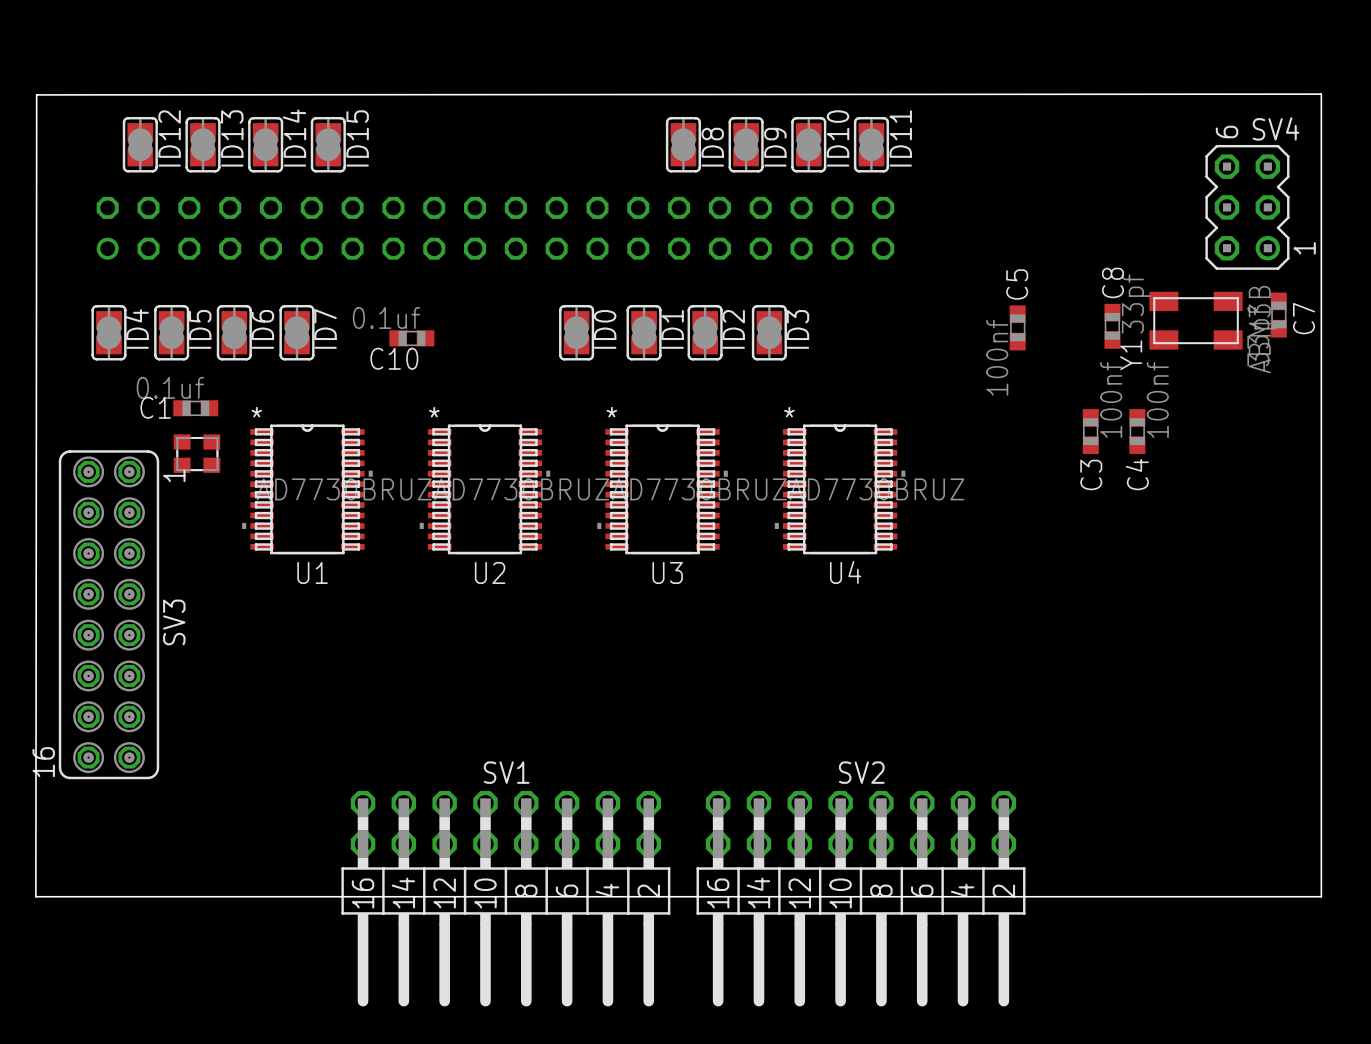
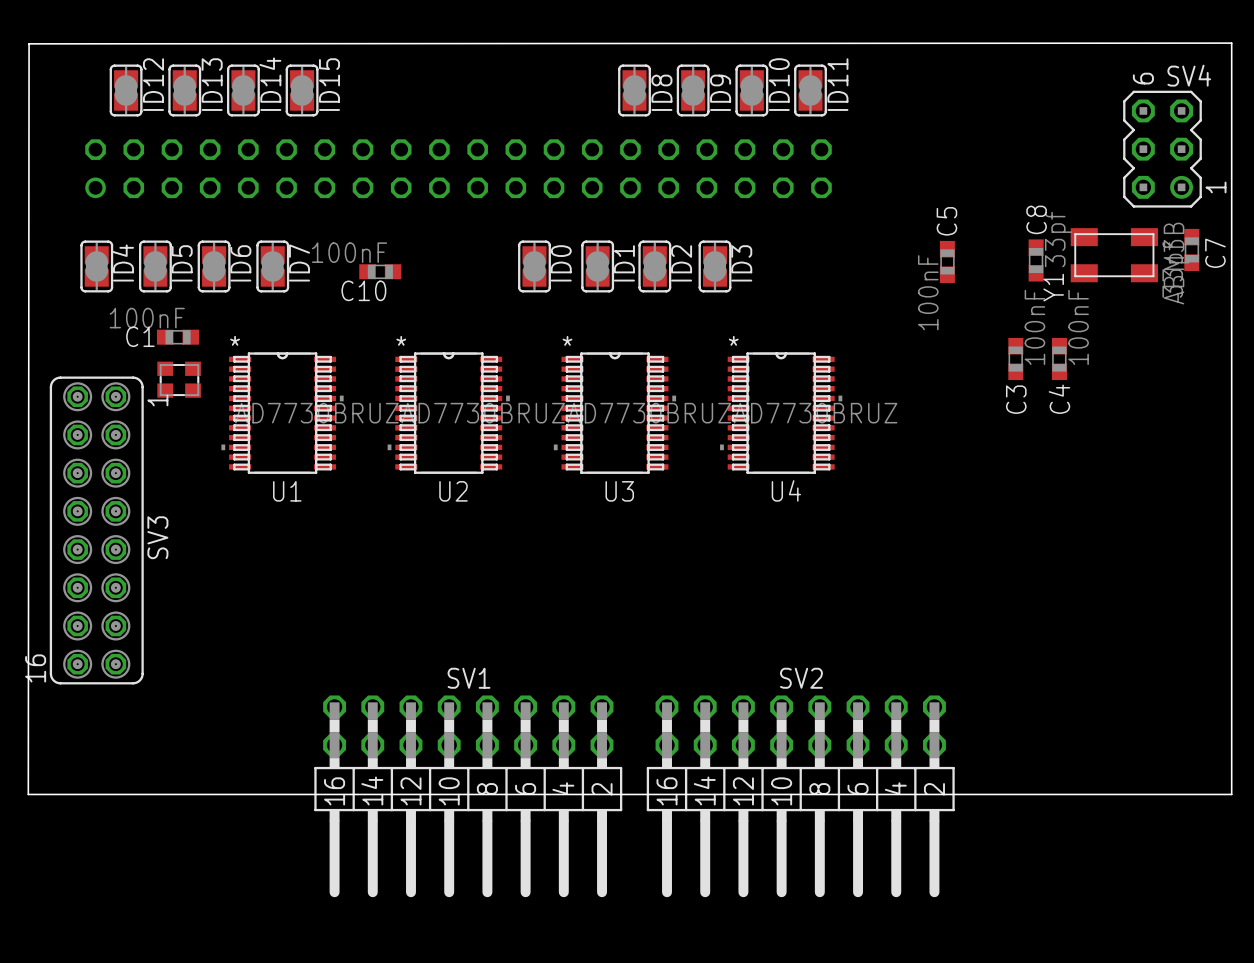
C10 value: 0.1uf (386, 317) -> 100nF (349, 252)
C5 value: 100nf (997, 357) -> 100nF (928, 292)
C1 value: 0.1uf (170, 387) -> 100nF (147, 318)
C3 value: 100nf (1111, 400) -> 100nF (1034, 327)
C4 value: 100nf (1157, 400) -> 100nF (1078, 327)

